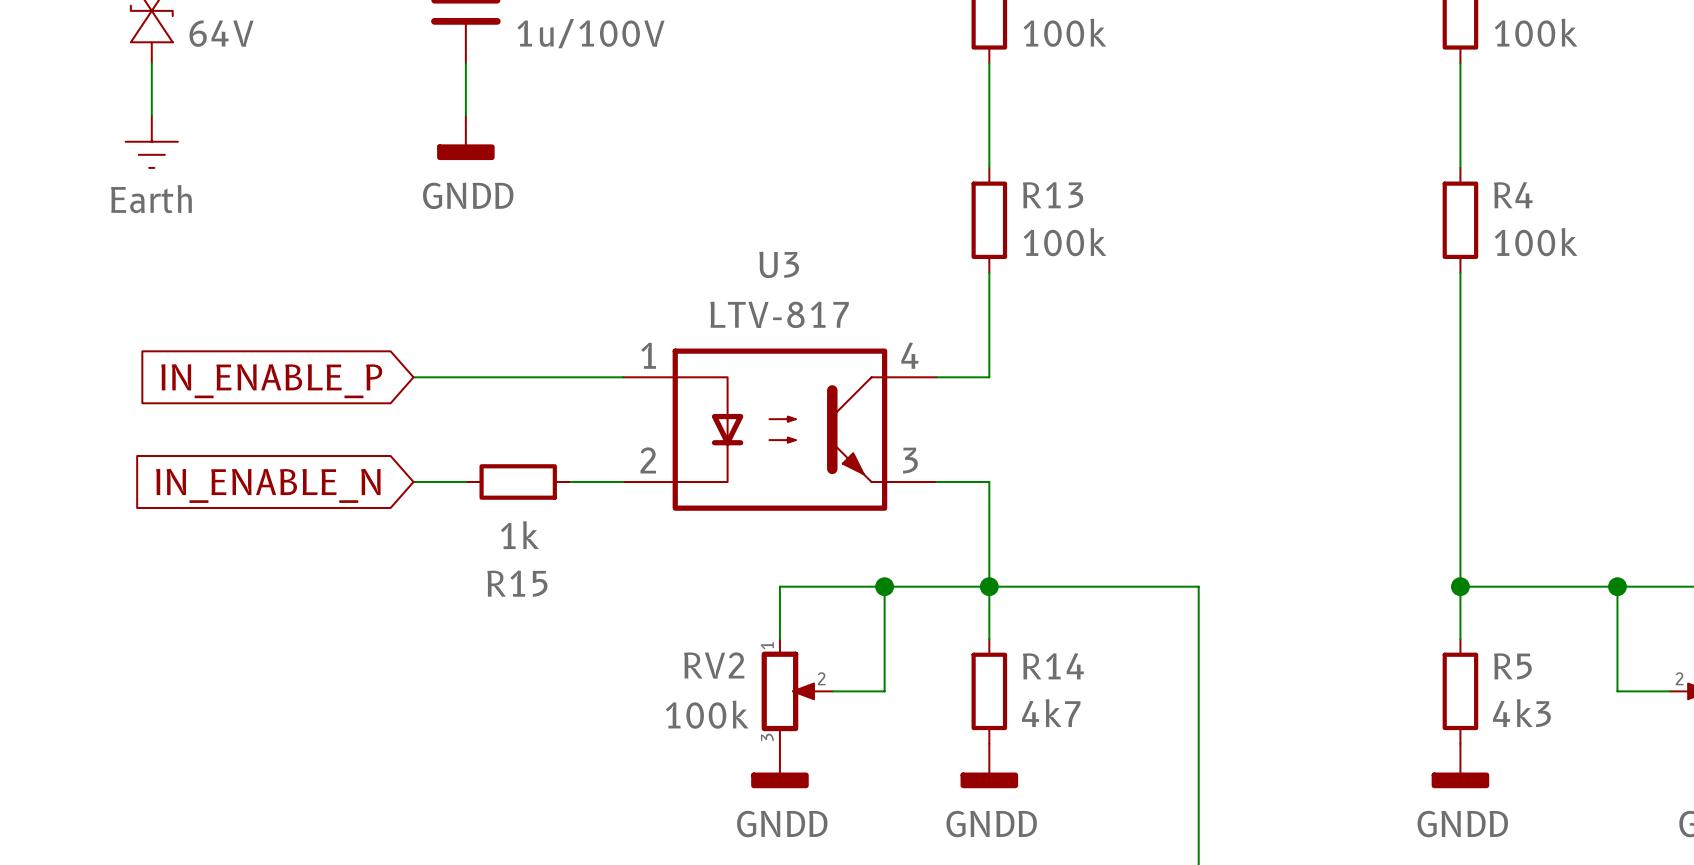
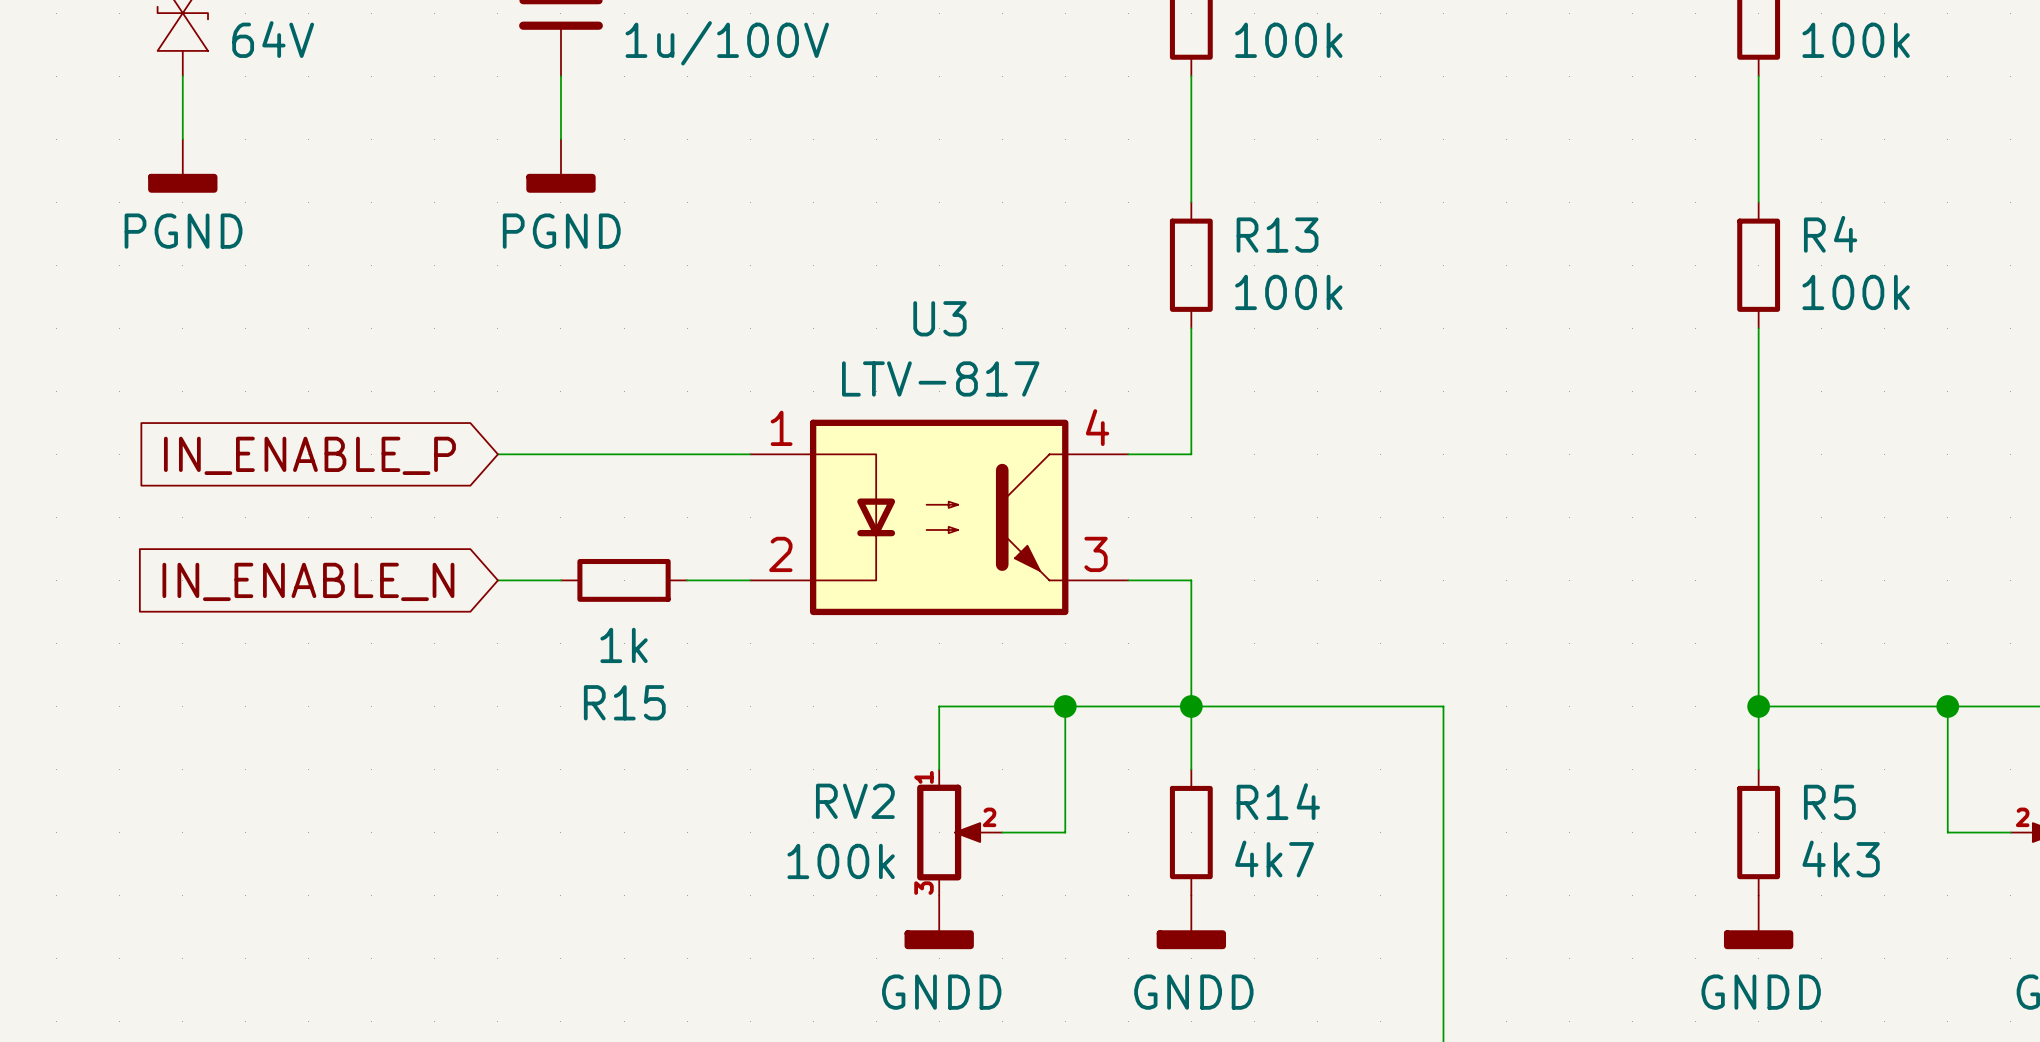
power symbol: GNDD (465, 137) -> PGND (560, 165)
power symbol: Earth (151, 141) -> PGND (182, 165)

